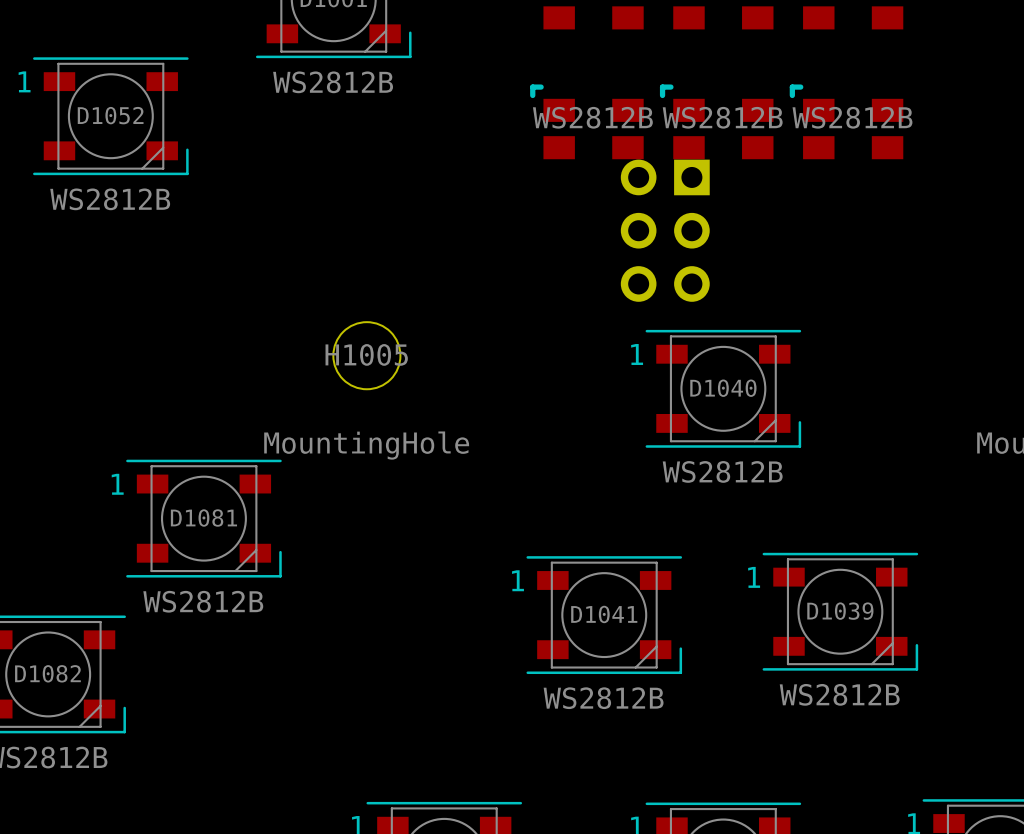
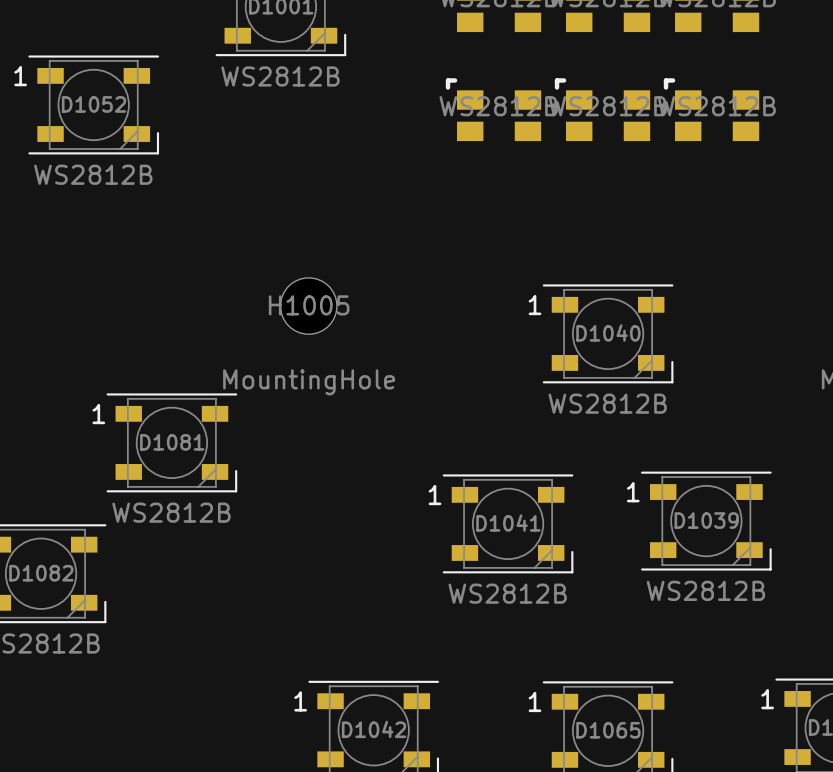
part: (665, 230) -> none

